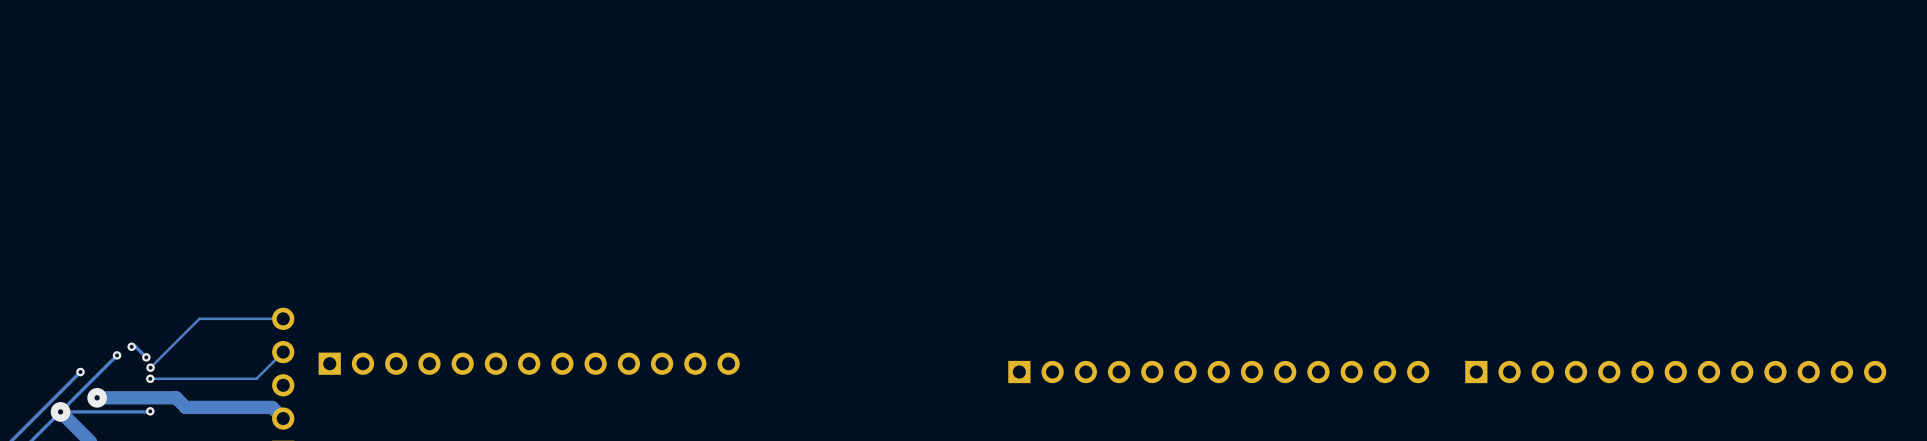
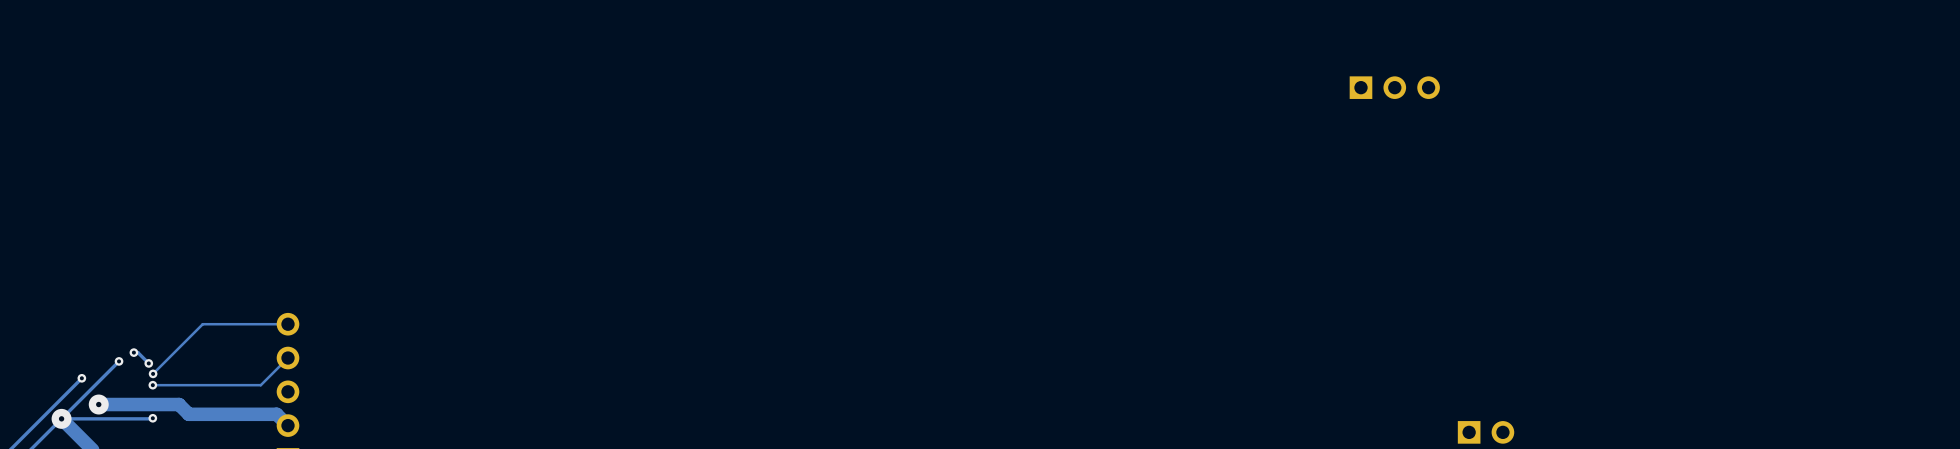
part: none -> (1394, 87)
part: (529, 363) -> none
part: (1218, 372) -> none
part: (1675, 372) -> none
part: none -> (1486, 432)

